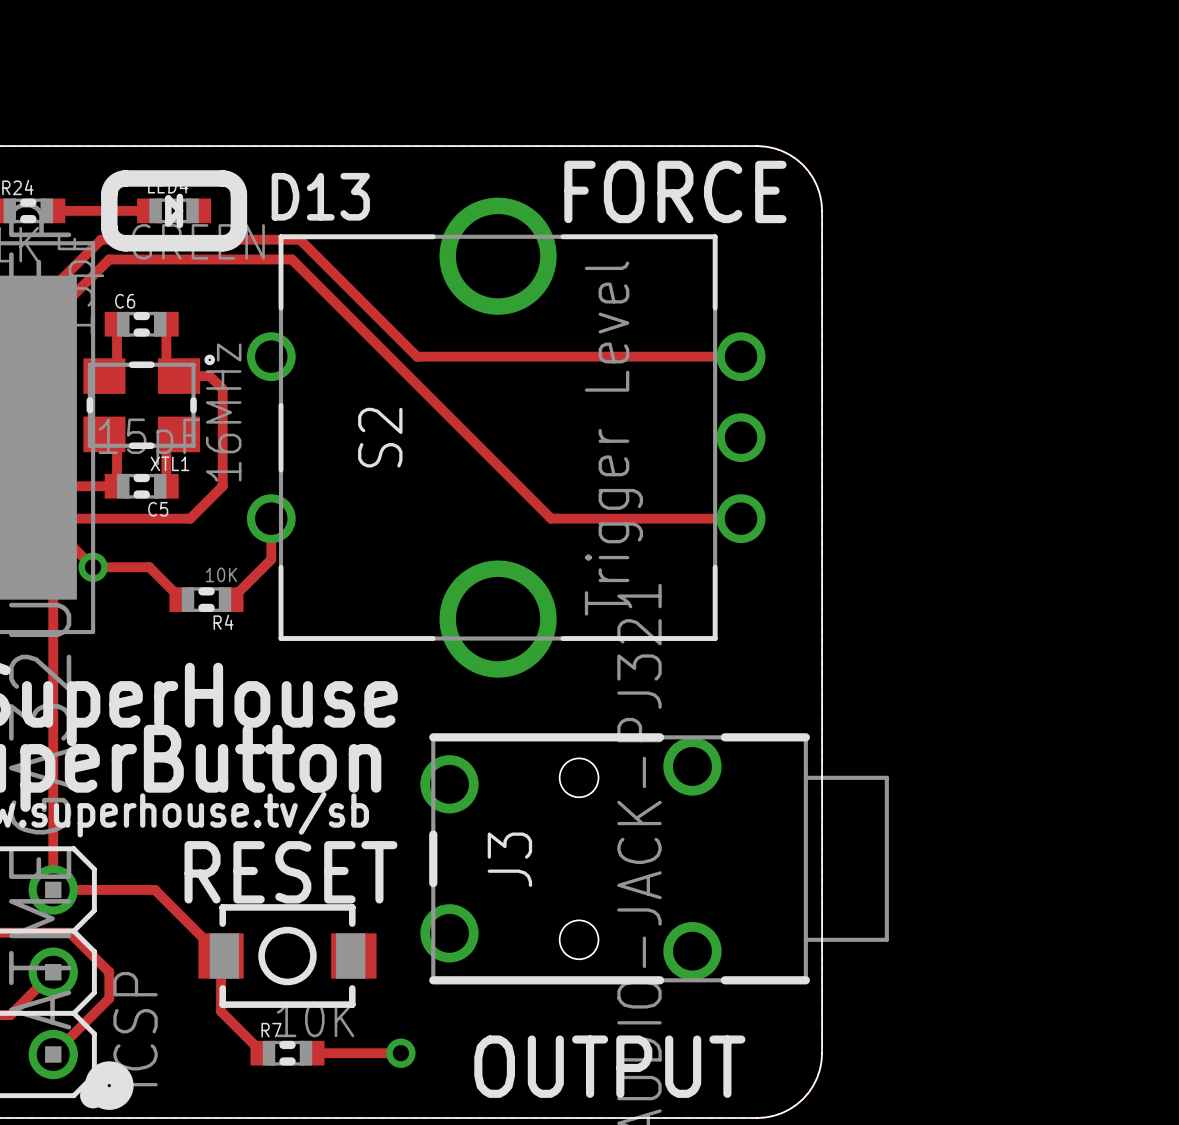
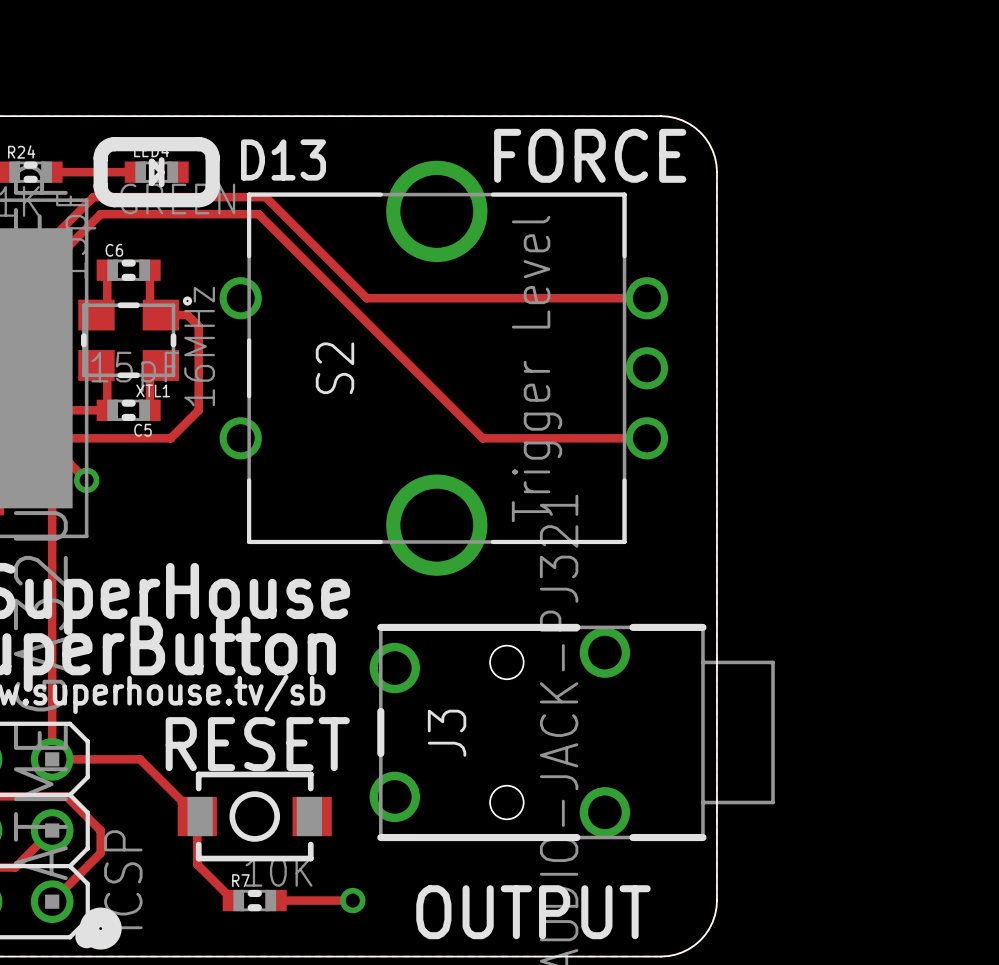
track: (271, 518) (271, 559) (231, 599) -> none
track: (93, 567) (149, 567) (181, 599) -> none
R4: 10K (206, 599) -> none

